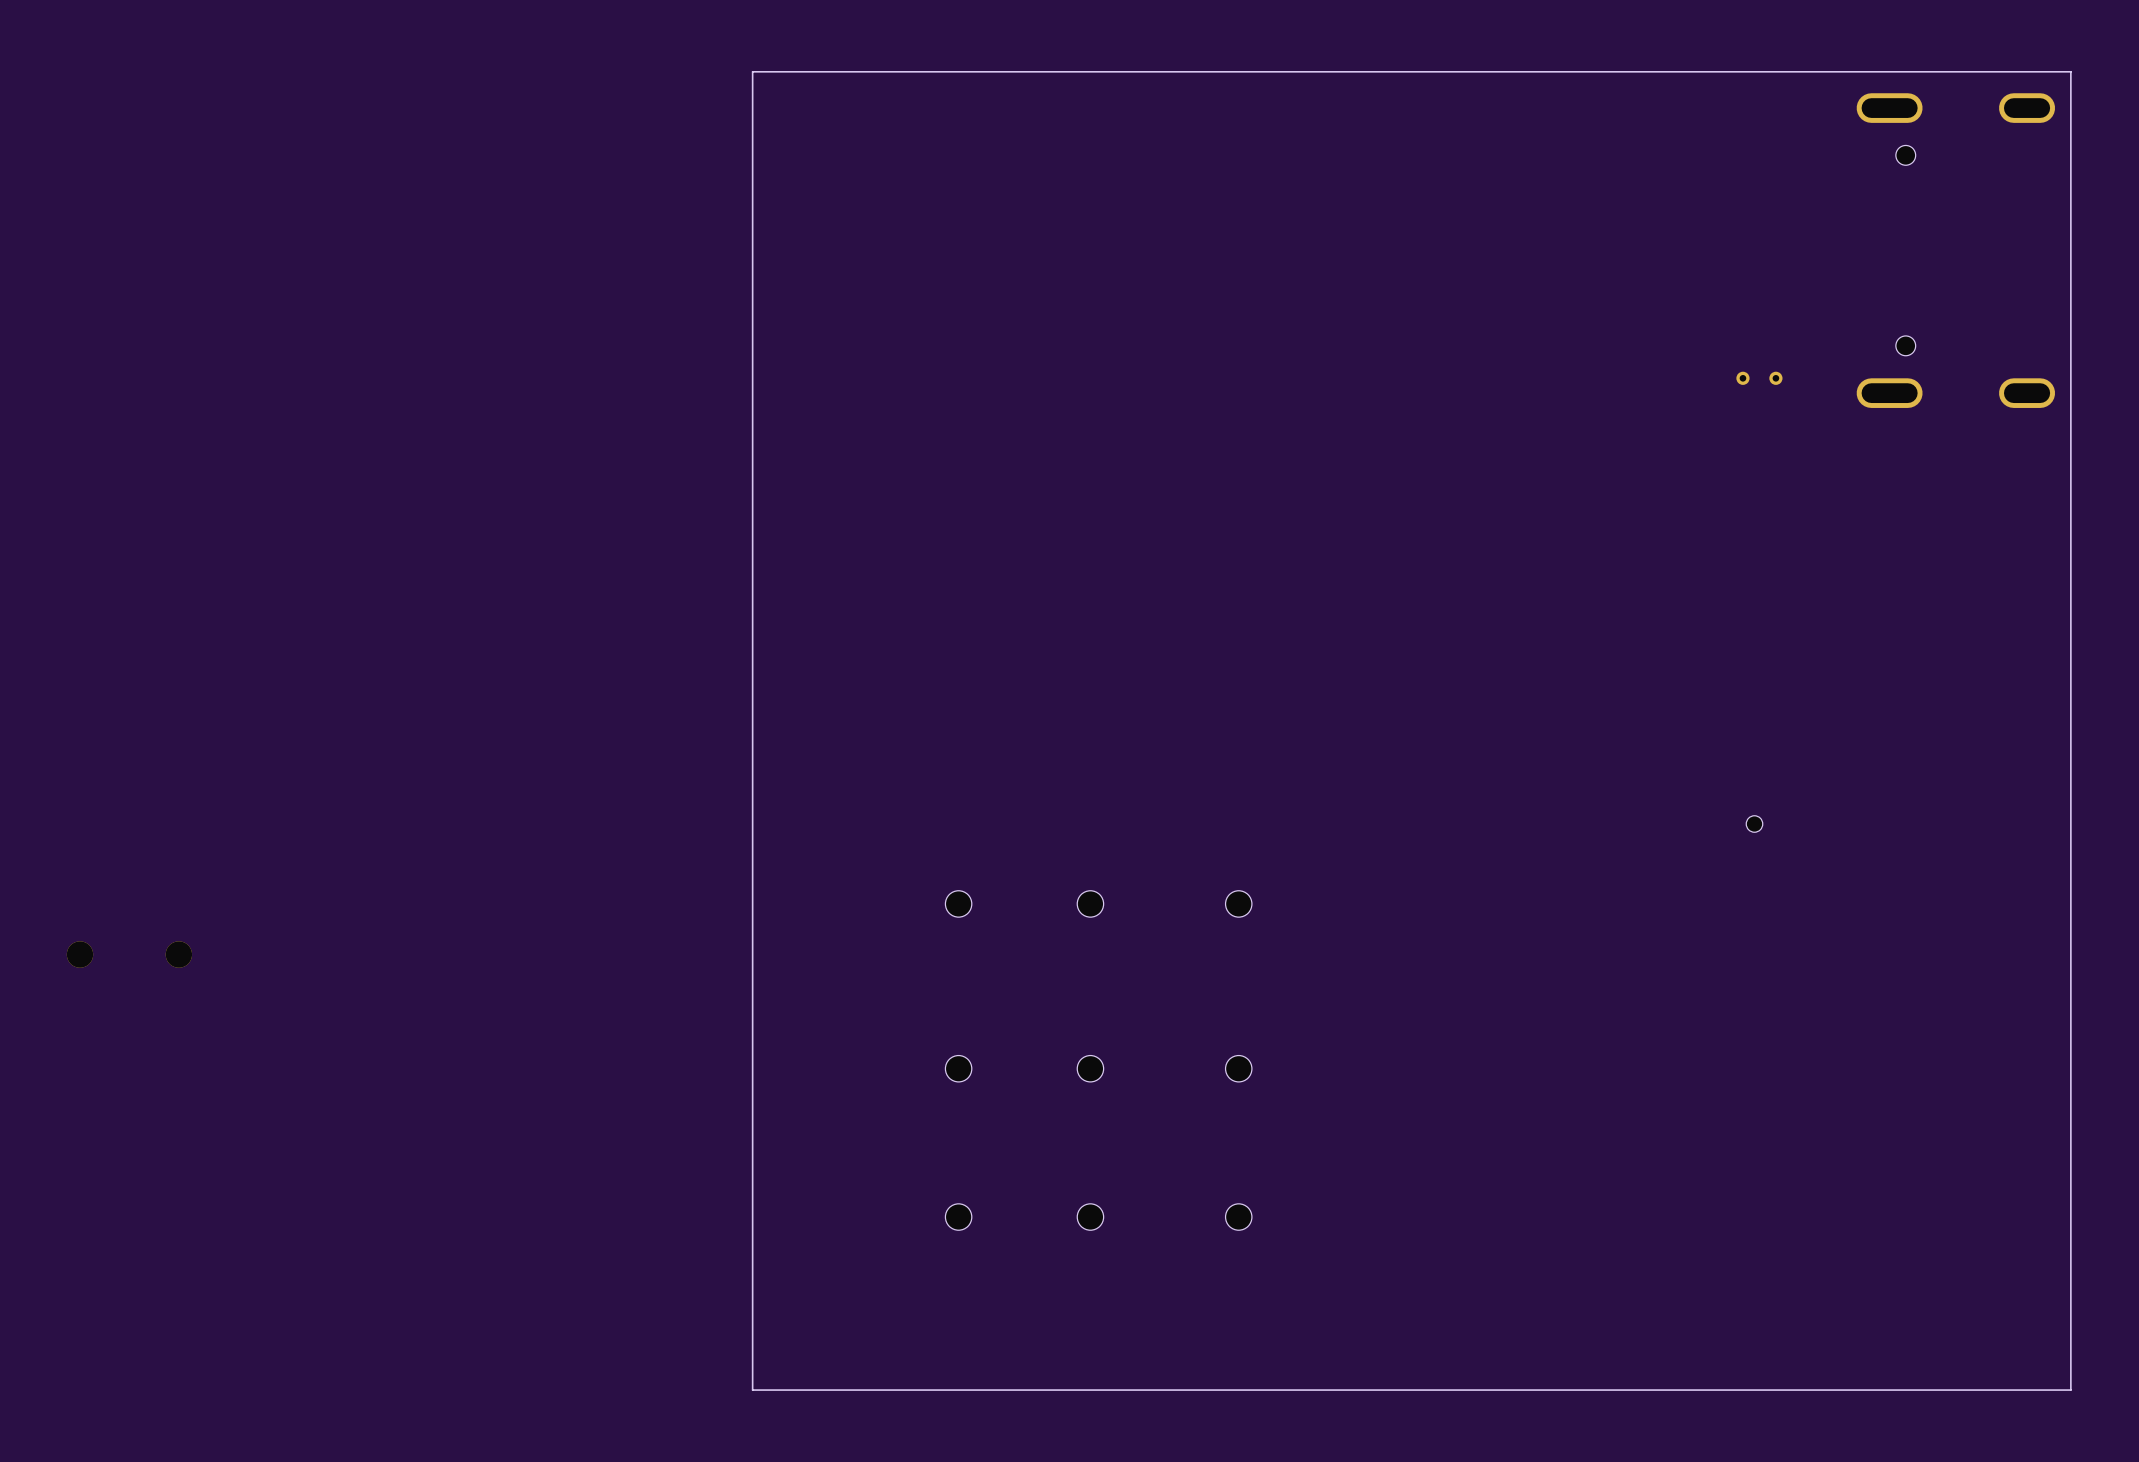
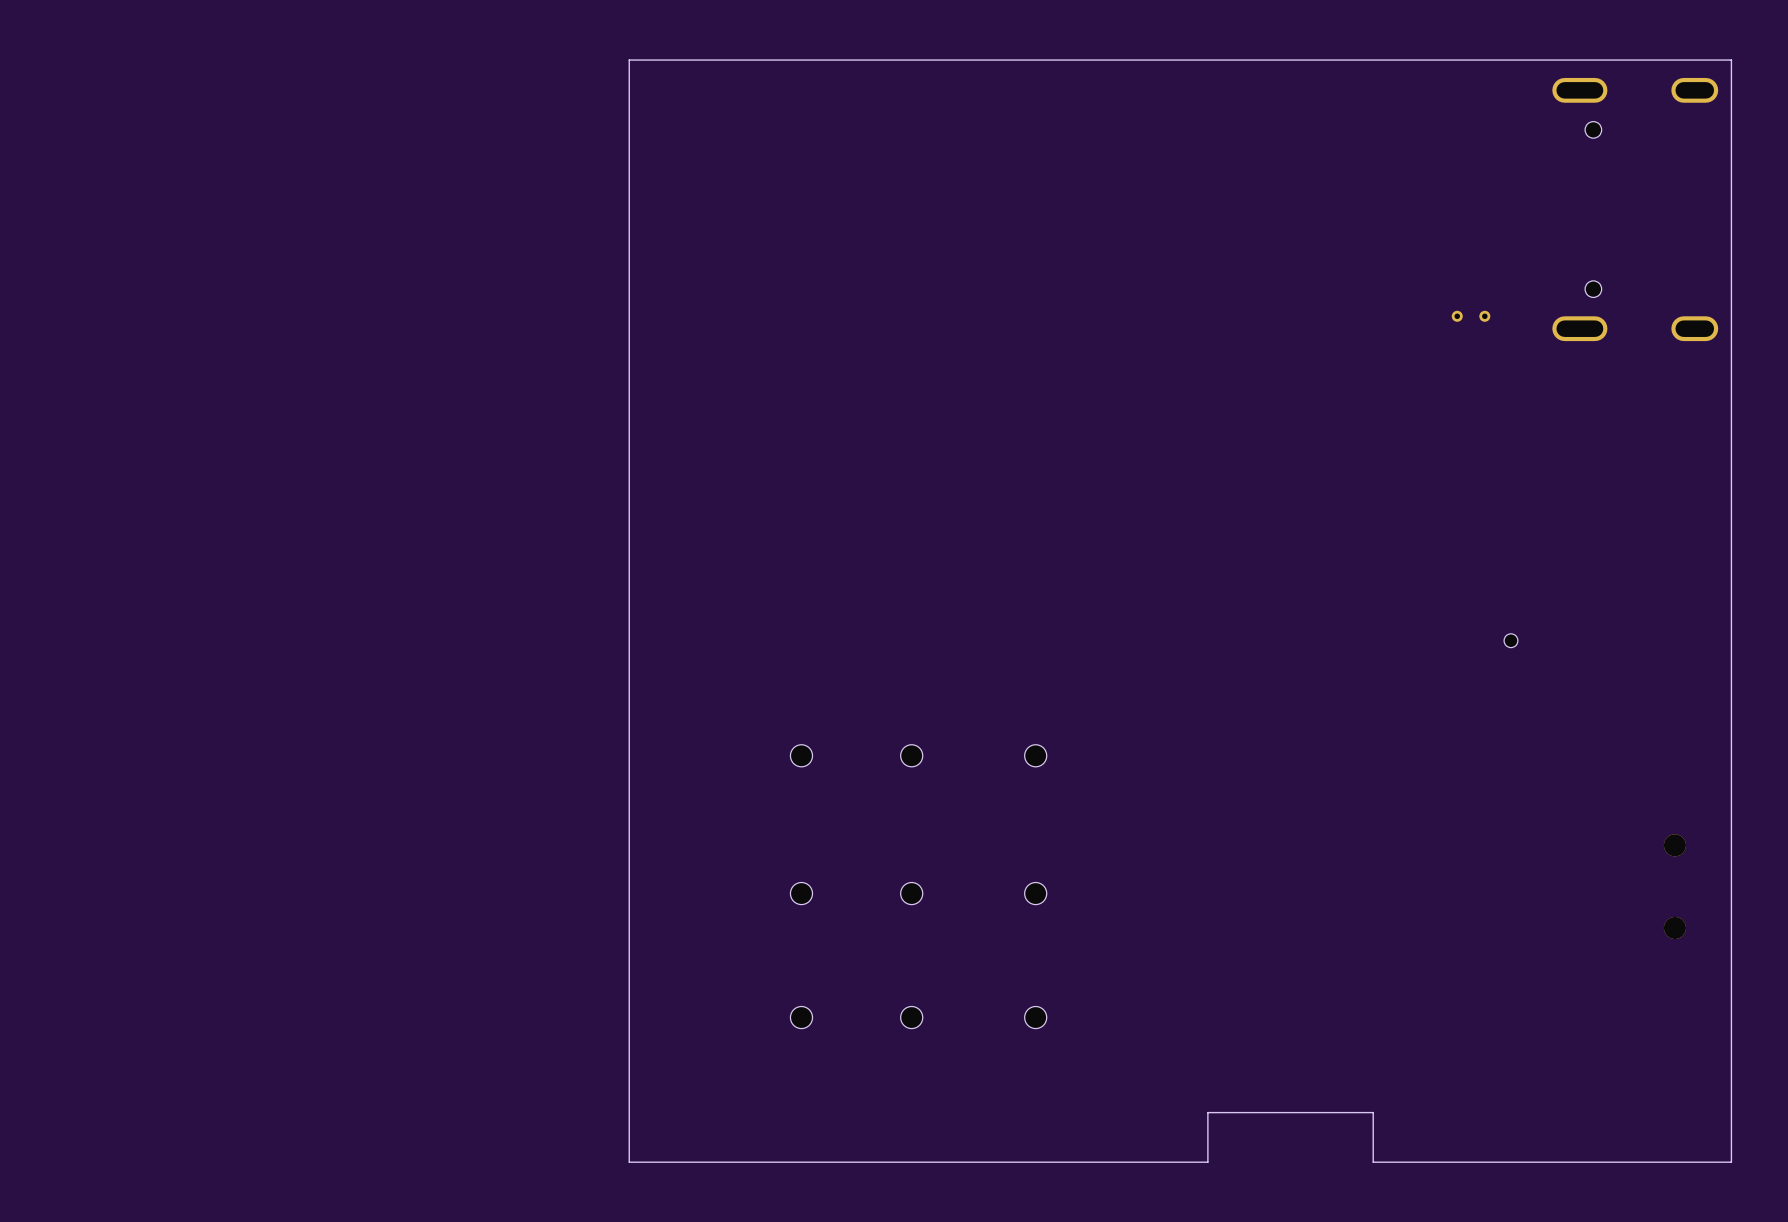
part position: (1754, 824) -> (1510, 640)
part: (129, 954) -> none
part: none -> (1674, 886)
board edge: (1642, 1390) (1444, 1390) -> (1373, 1162) (1373, 1112) (1207, 1112) (1207, 1162)

